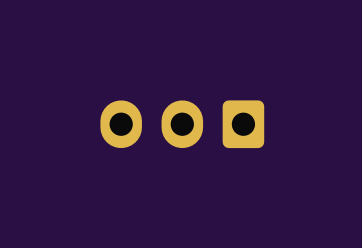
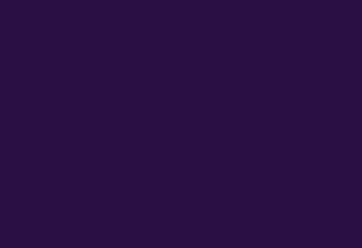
part: (182, 124) -> none

